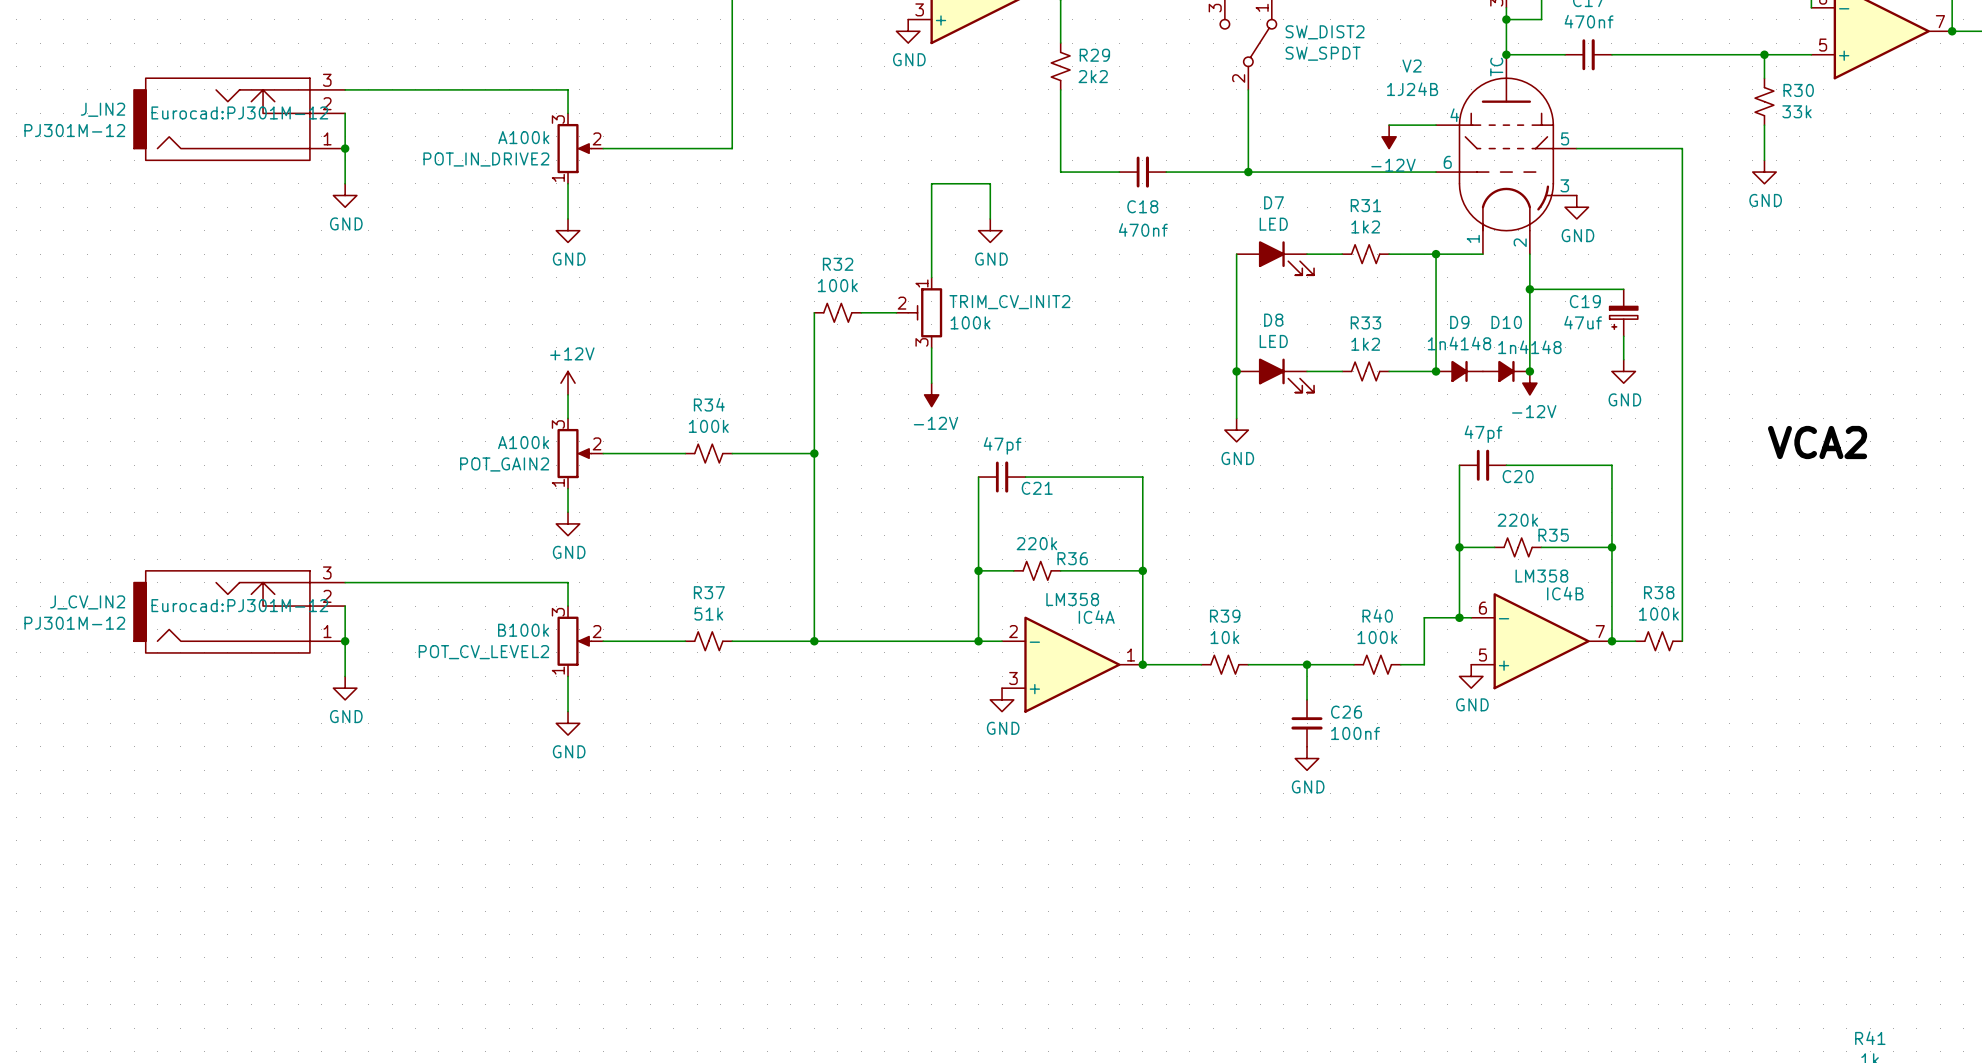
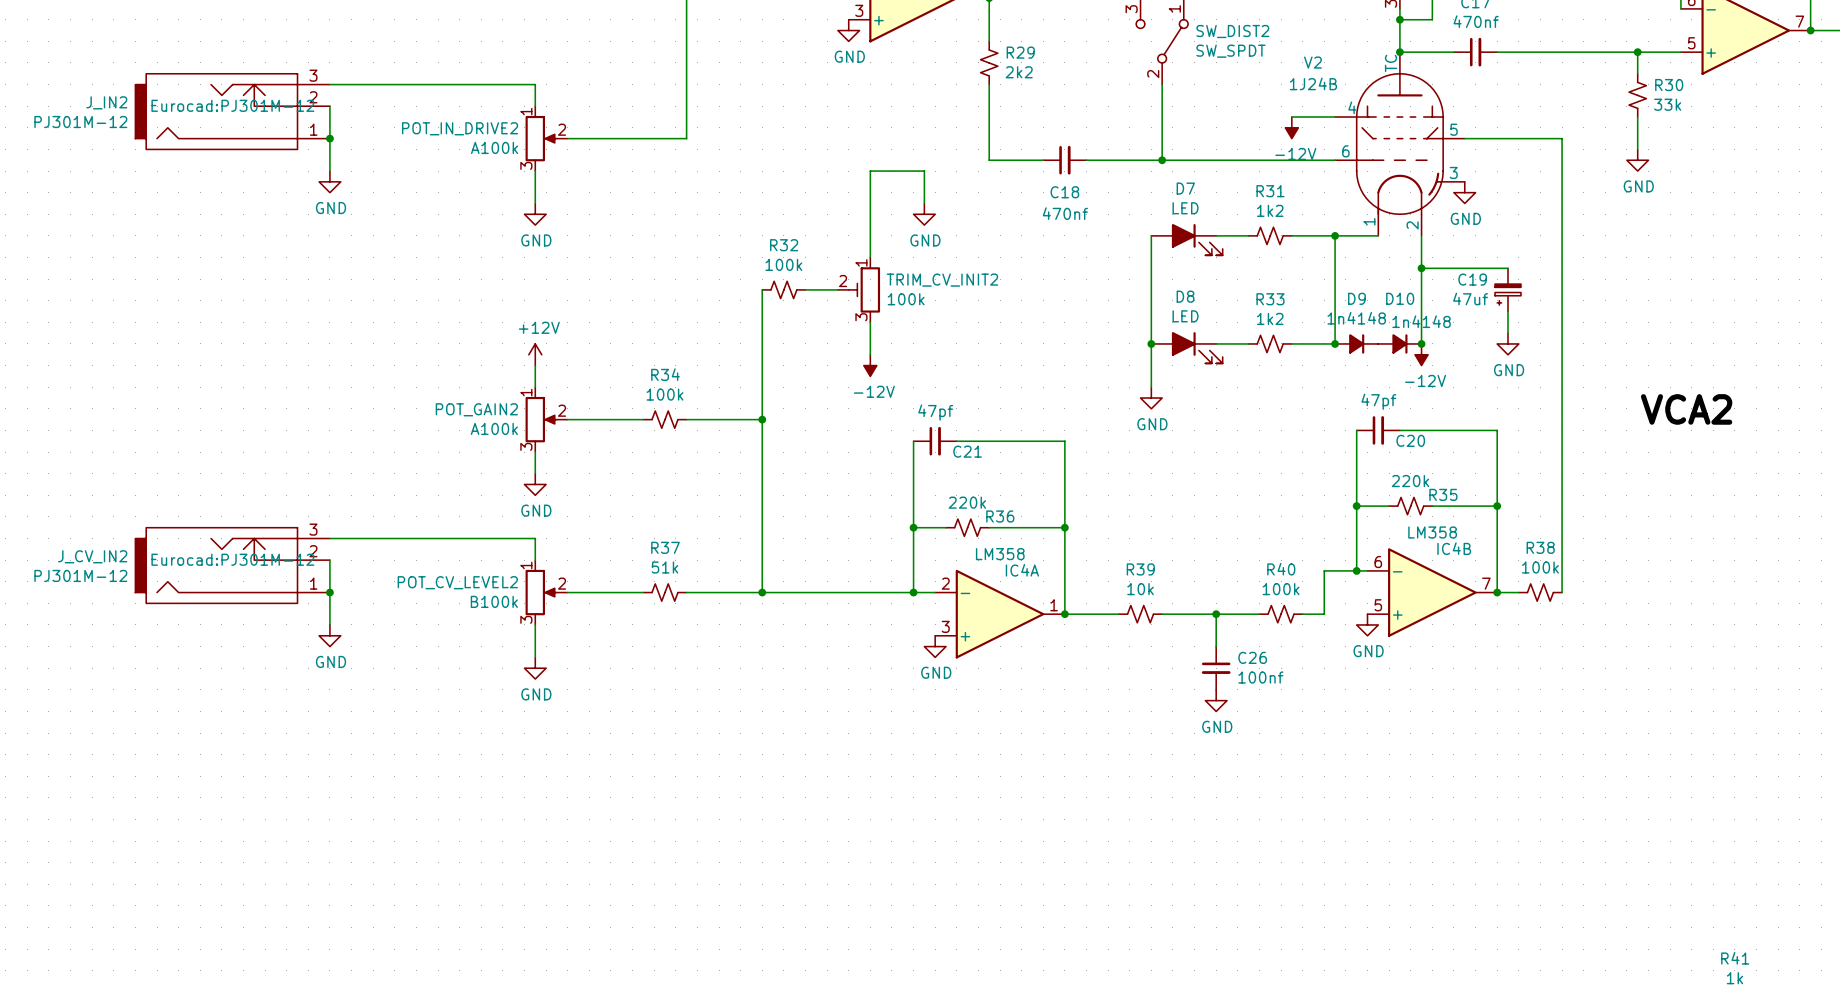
POT_IN_DRIVE2 flip: as is (574, 148) -> up-down (541, 138)
POT_GAIN2 flip: as is (574, 453) -> up-down (541, 419)
POT_CV_LEVEL2 flip: as is (574, 641) -> up-down (541, 592)

